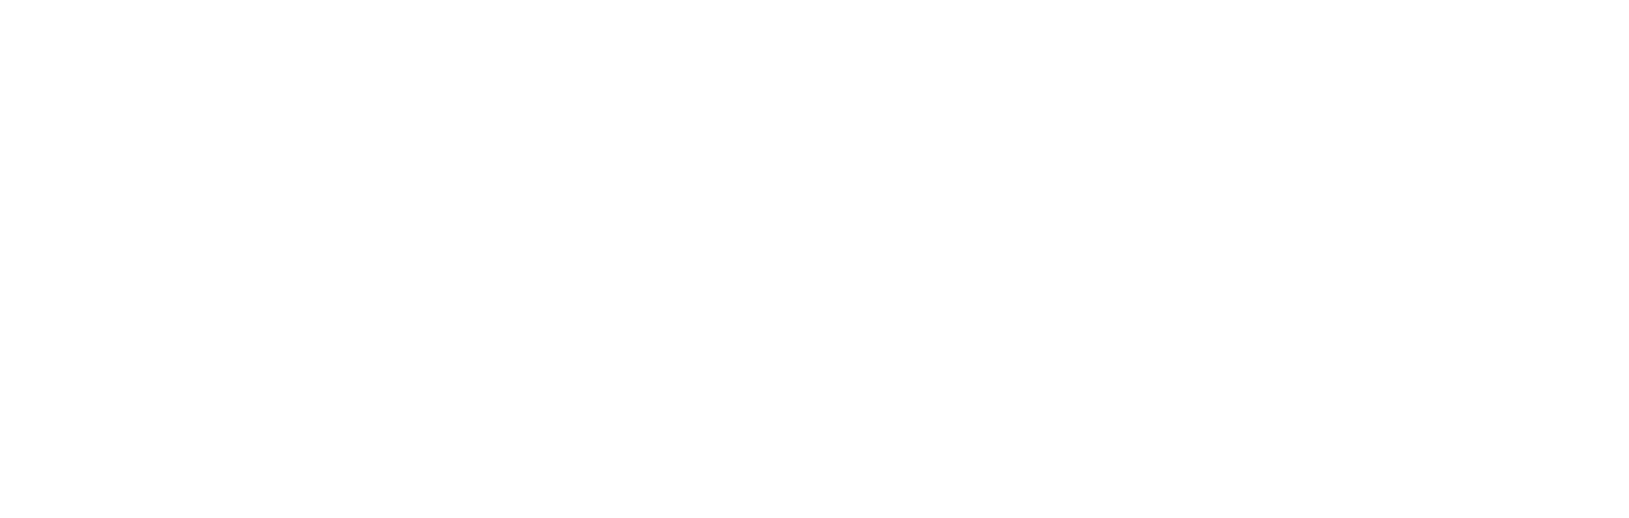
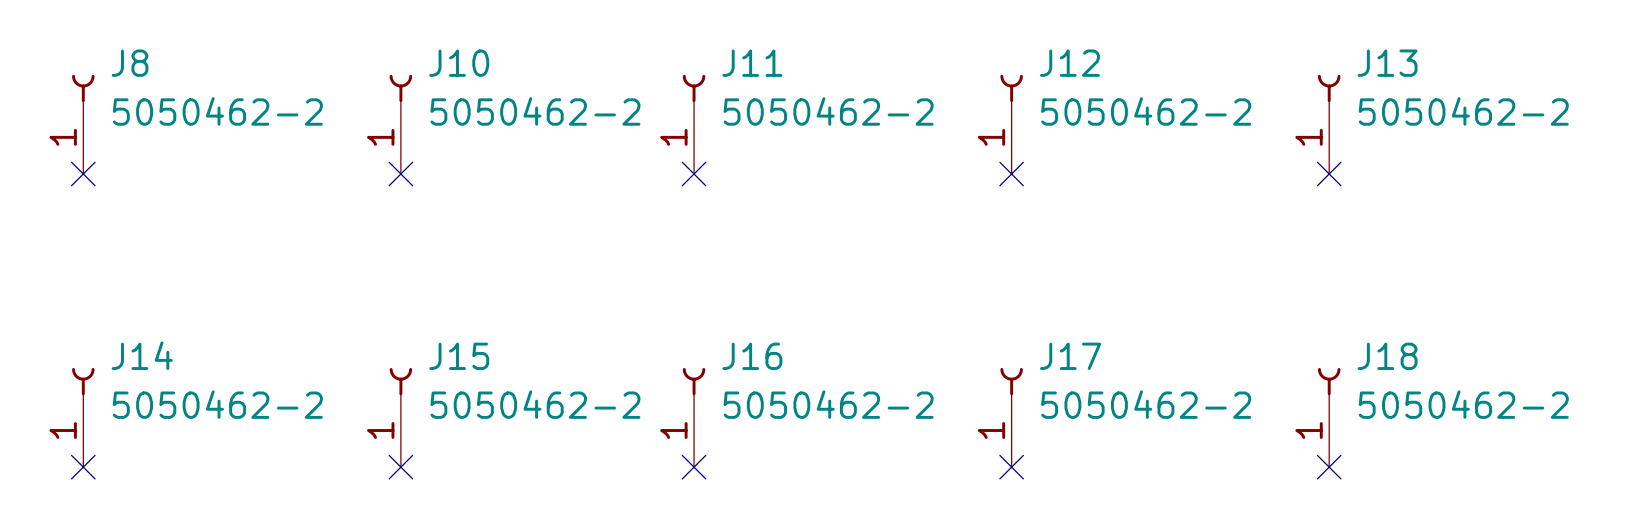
J8: none -> 5050462-2 (83, 124)
J10: none -> 5050462-2 (400, 124)
J11: none -> 5050462-2 (694, 124)
J12: none -> 5050462-2 (1011, 124)
J13: none -> 5050462-2 (1329, 124)
no-connect mark: none -> (83, 174)
no-connect mark: none -> (400, 174)
no-connect mark: none -> (694, 174)
no-connect mark: none -> (1011, 174)
no-connect mark: none -> (1329, 174)
J14: none -> 5050462-2 (83, 417)
J15: none -> 5050462-2 (400, 417)
J16: none -> 5050462-2 (694, 417)
J17: none -> 5050462-2 (1011, 417)
J18: none -> 5050462-2 (1329, 417)
no-connect mark: none -> (83, 467)
no-connect mark: none -> (400, 467)
no-connect mark: none -> (694, 467)
no-connect mark: none -> (1011, 467)
no-connect mark: none -> (1329, 467)

